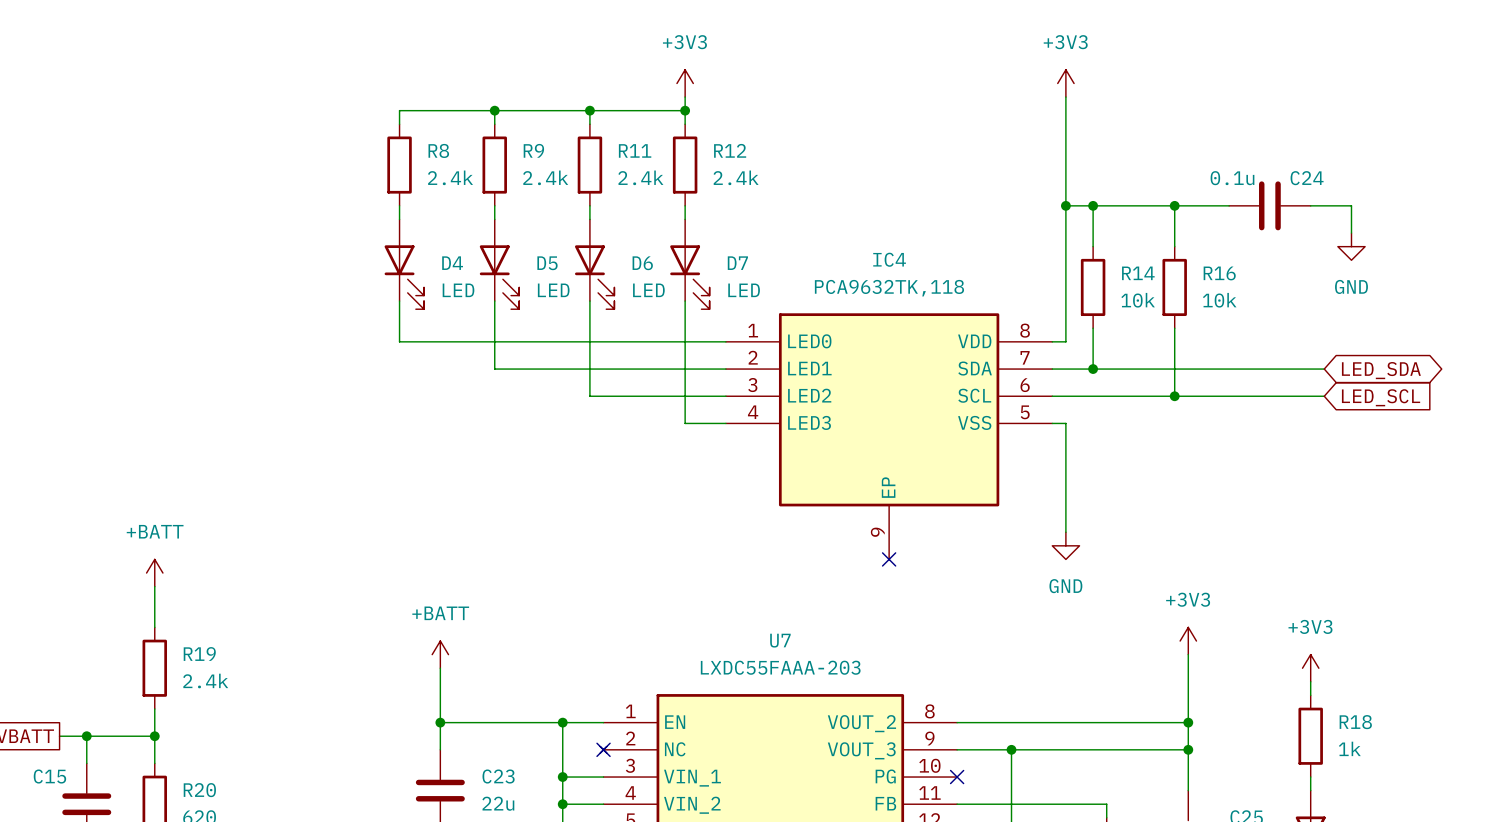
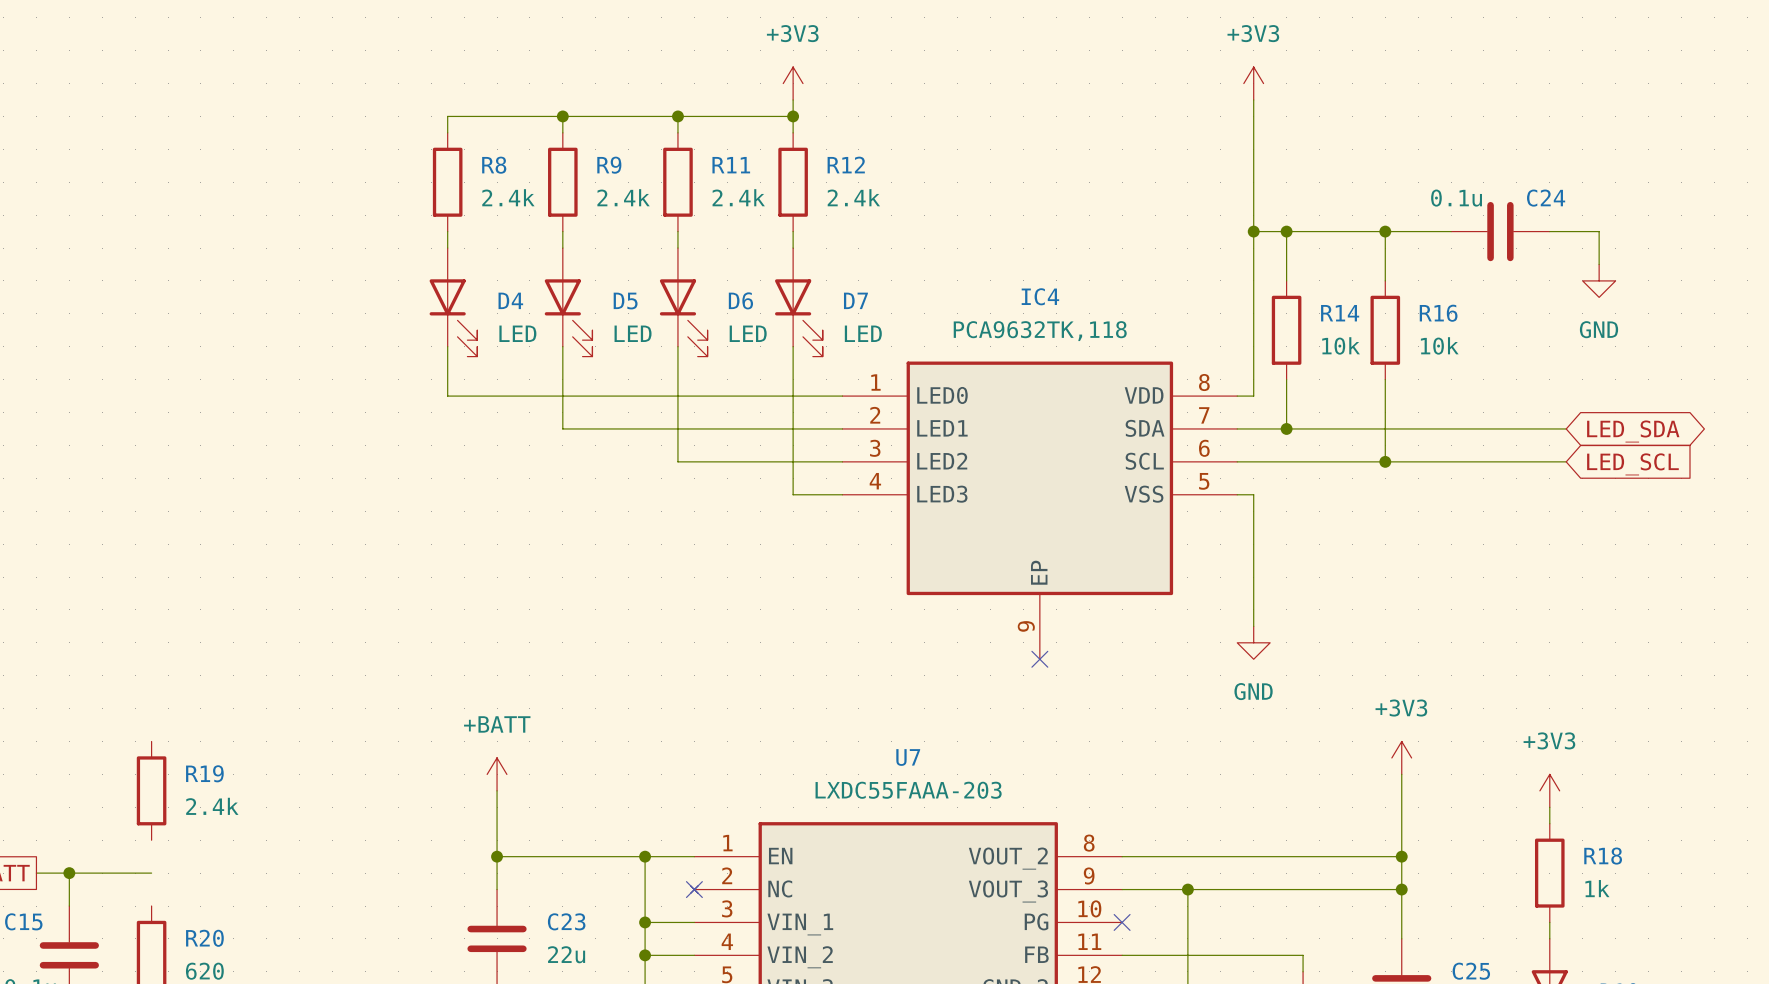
power symbol: +BATT (154, 573) -> none
wire: (154, 586) (154, 627) -> none
wire: (154, 709) (154, 763) -> none
junction: (154, 736) -> none

